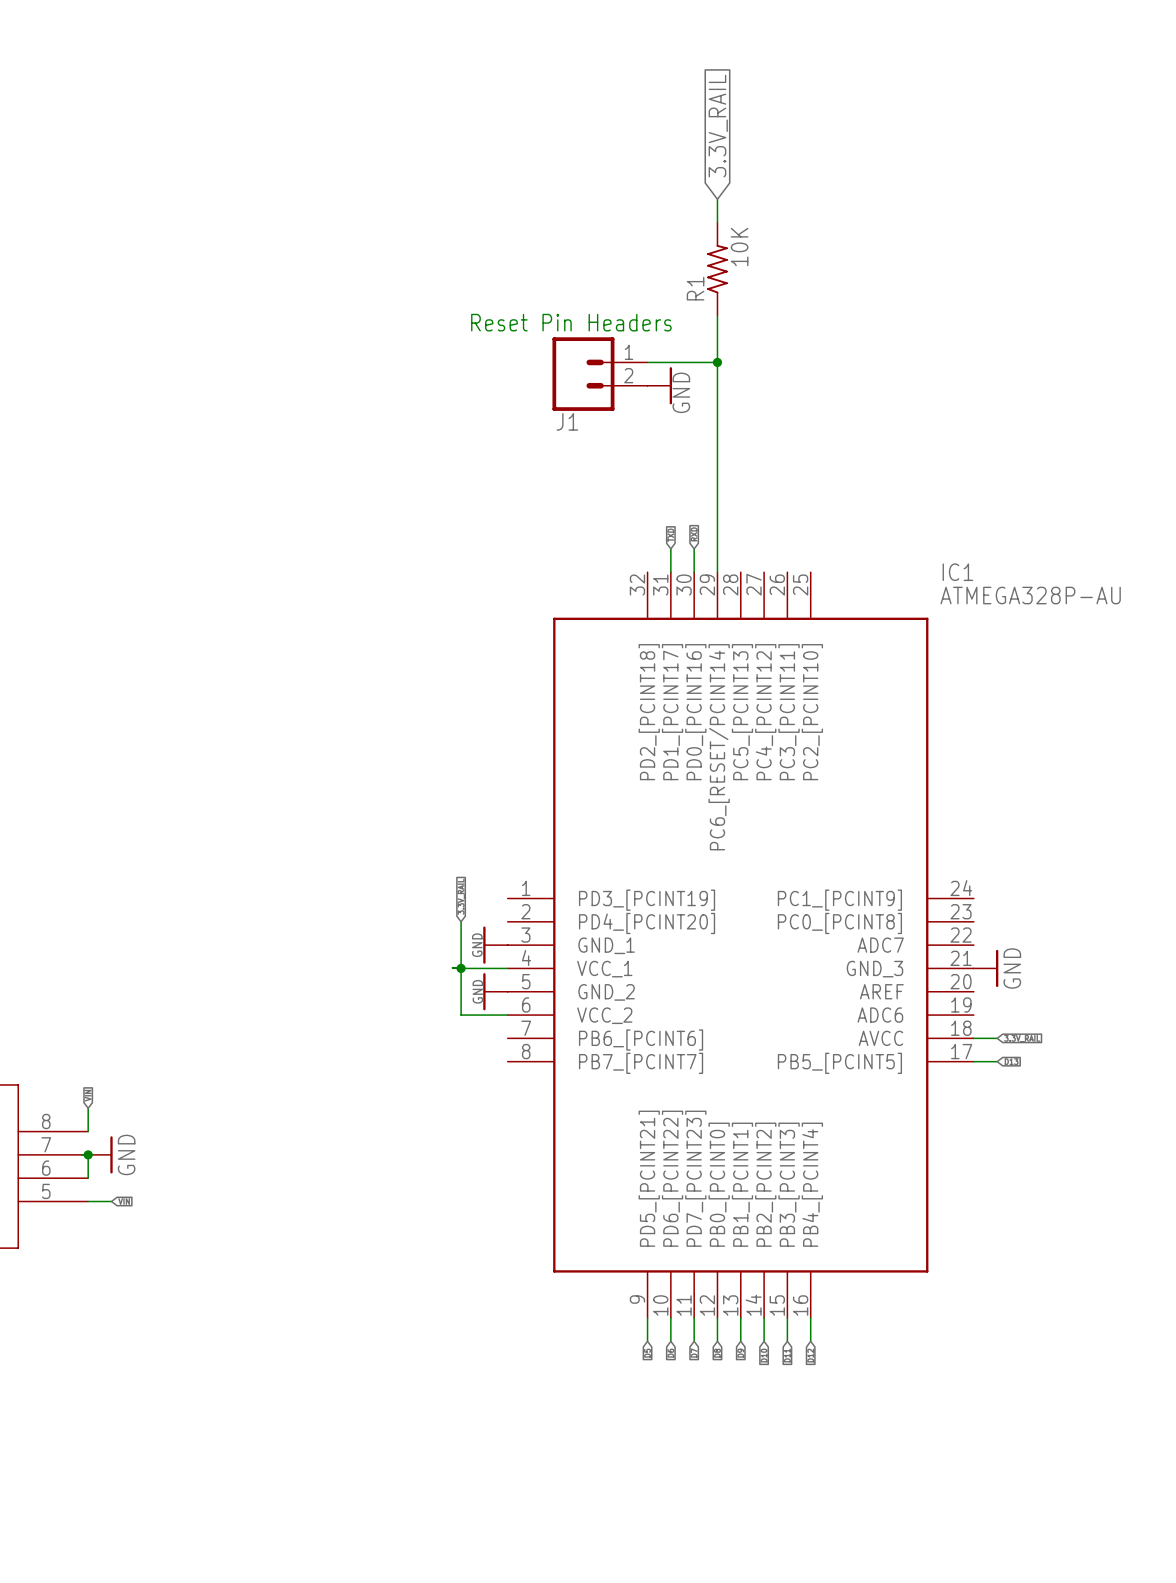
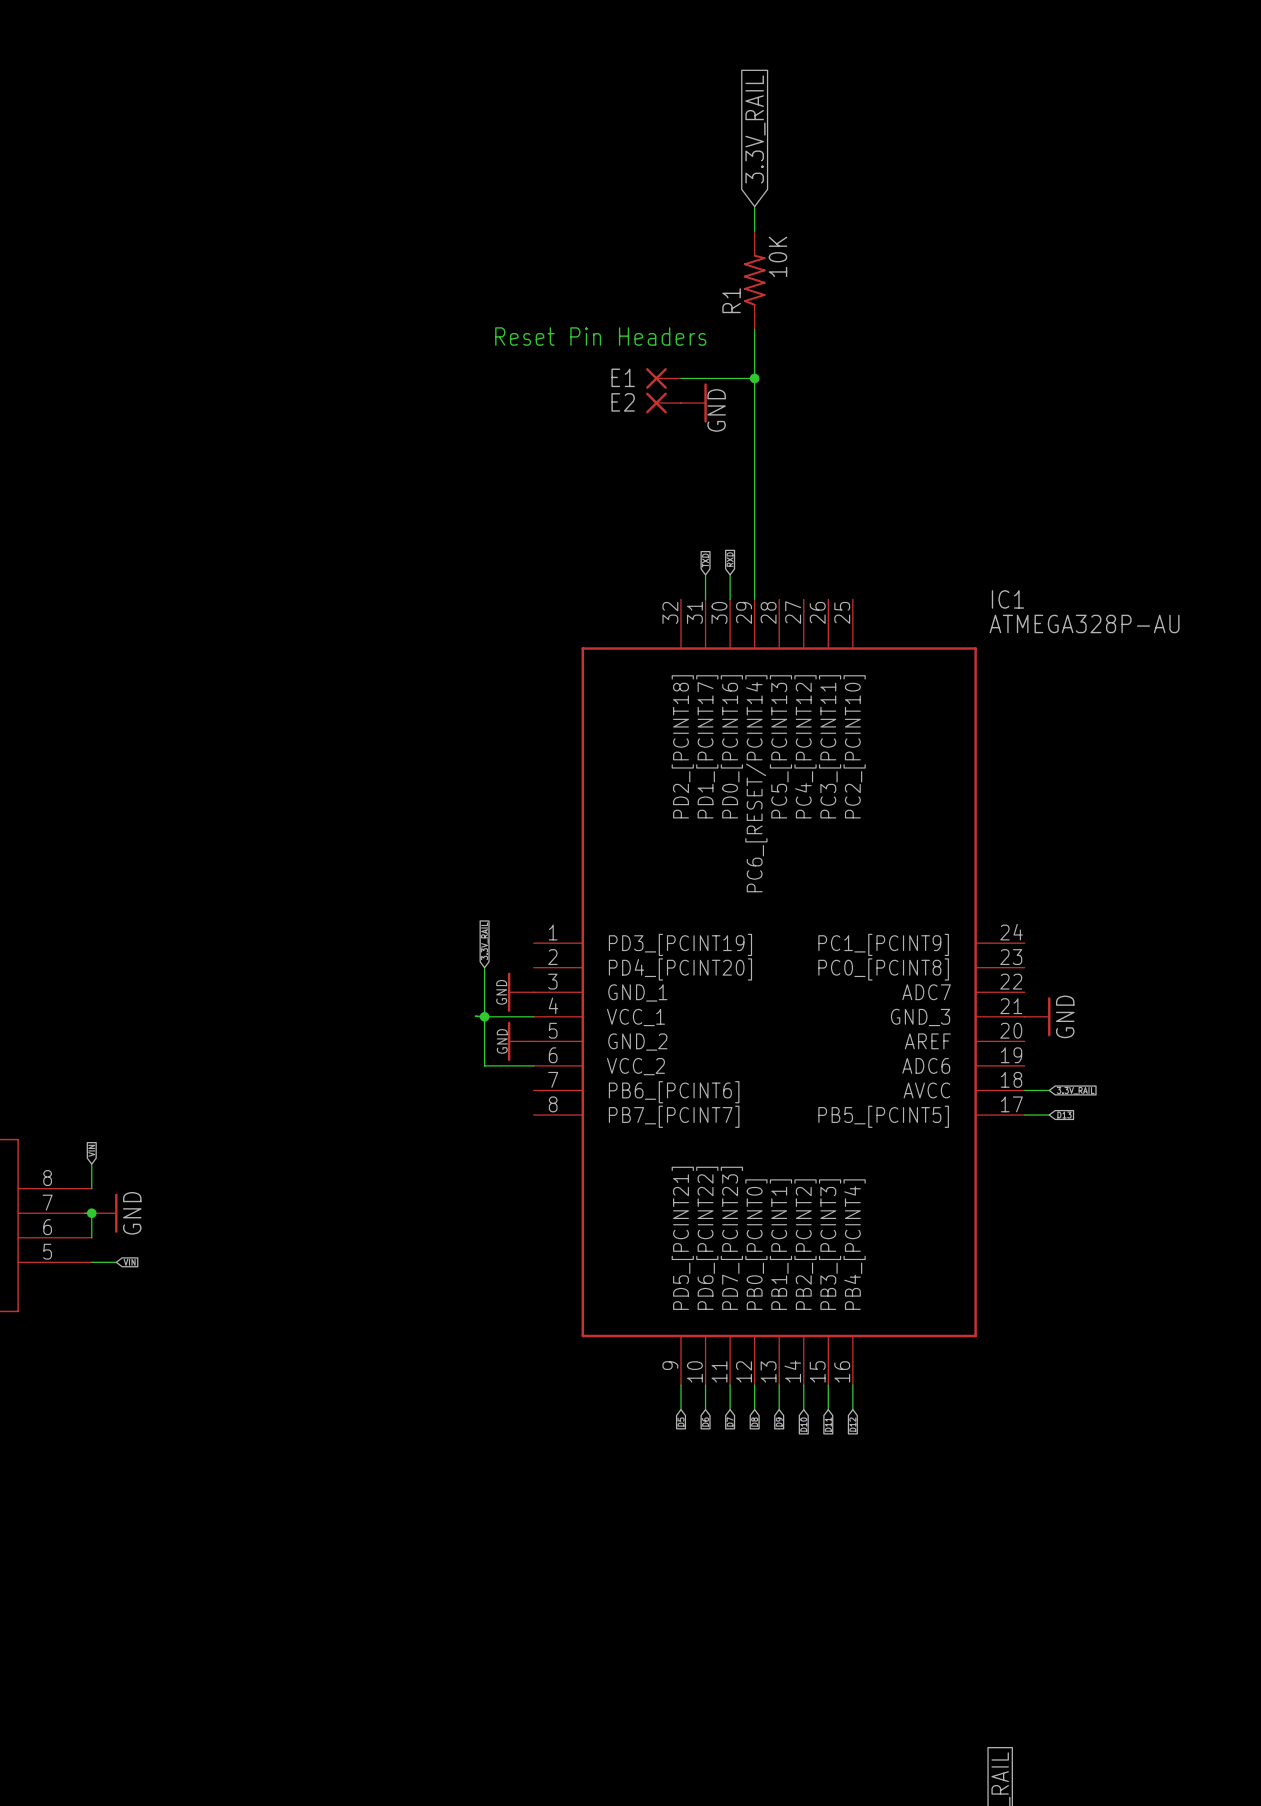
E1: none -> (663, 378)
J1: (600, 374) -> none
E2: none -> (663, 403)

